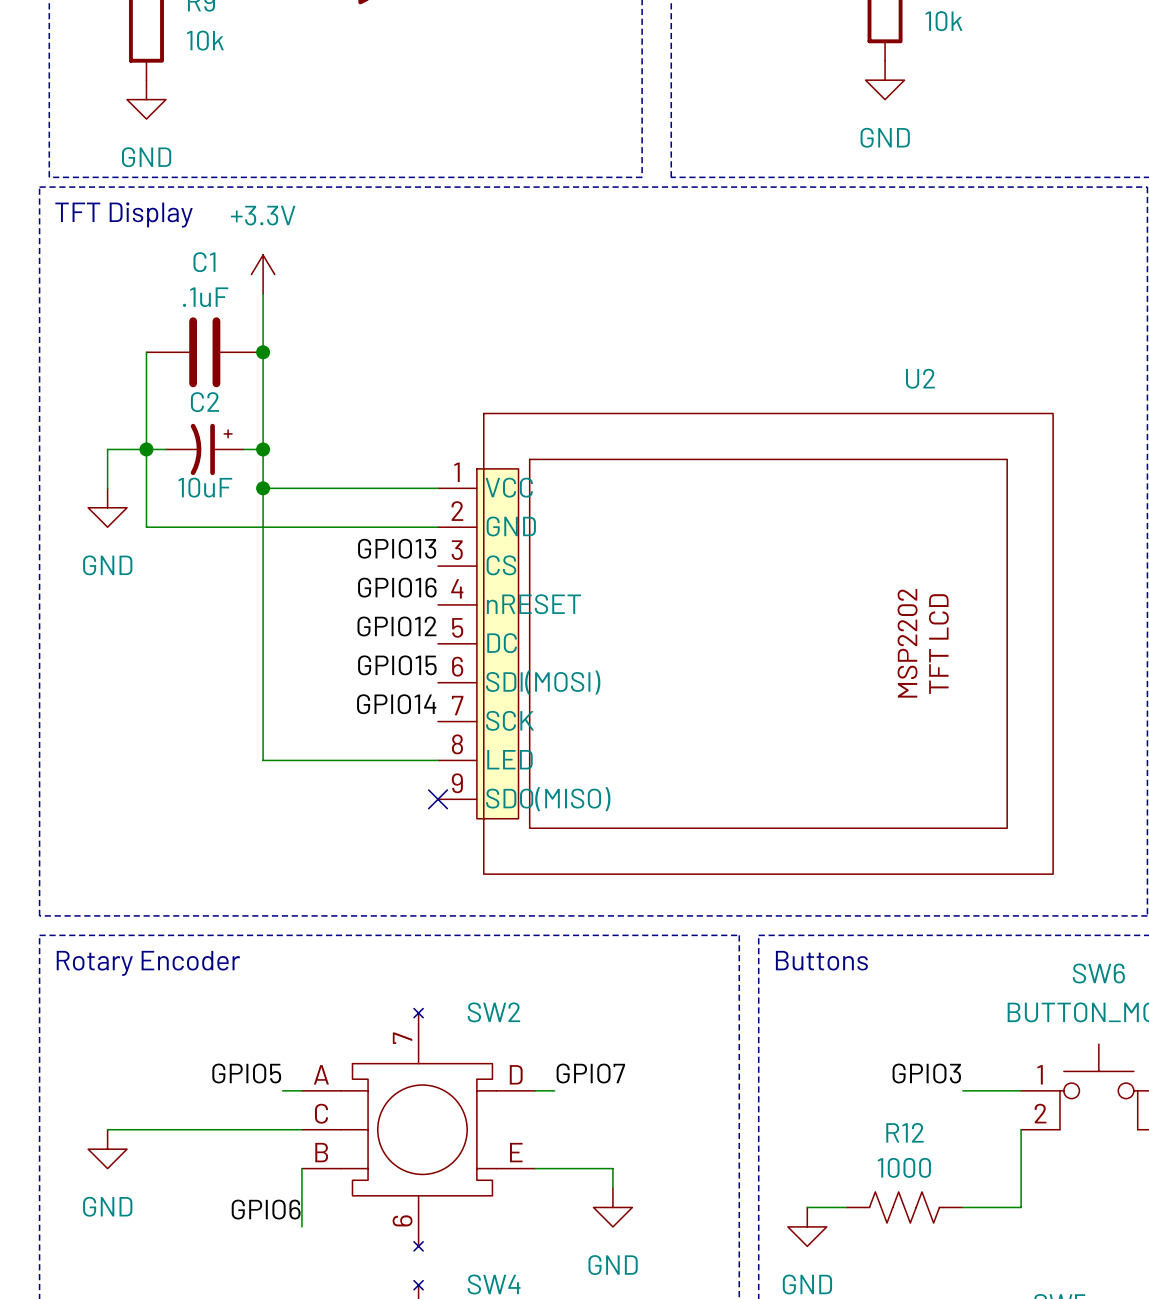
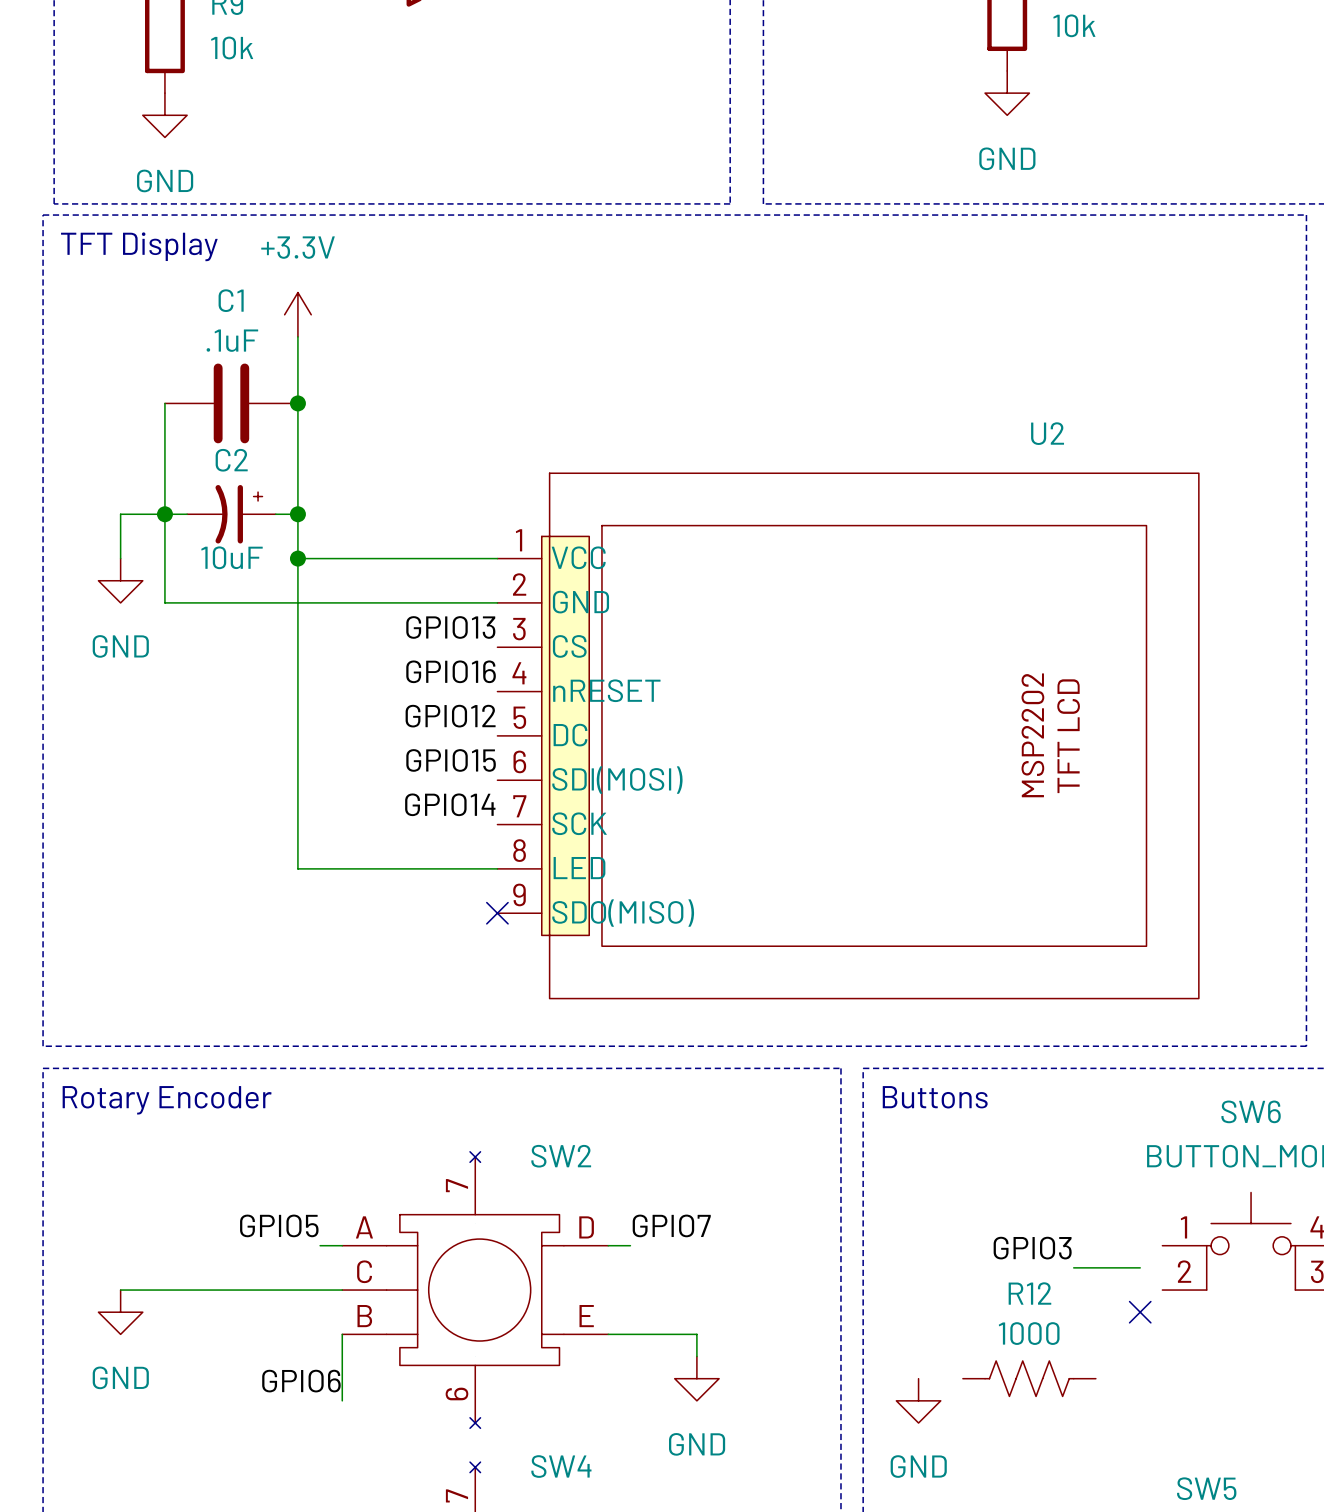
label position: GPIO3 (926, 1073) -> GPIO3 (1032, 1248)
wire: (962, 1090) (1021, 1090) -> (1073, 1267) (1140, 1267)
wire: (1021, 1129) (1021, 1207) (962, 1207) -> none
no-connect mark: none -> (1140, 1312)
wire: (807, 1207) (846, 1207) -> none

